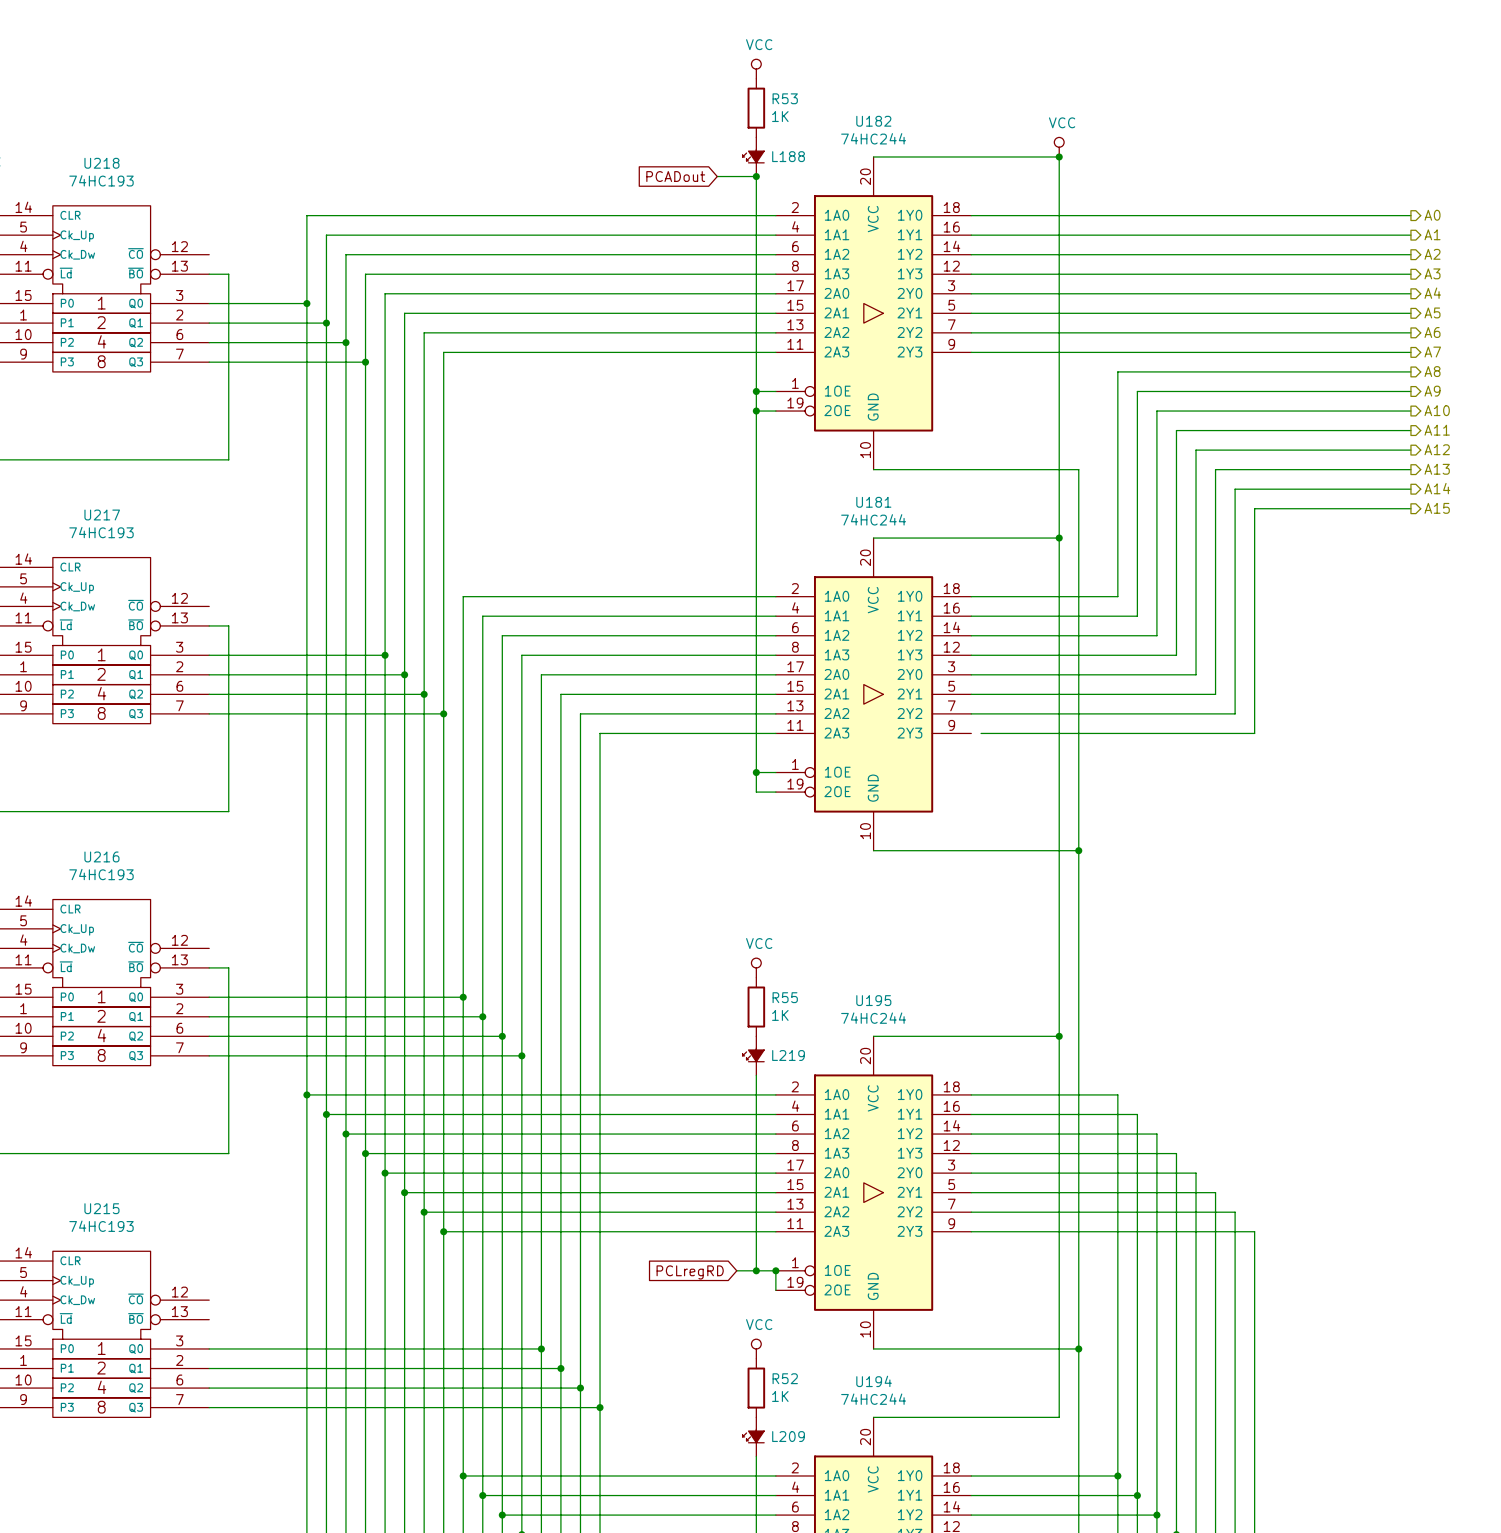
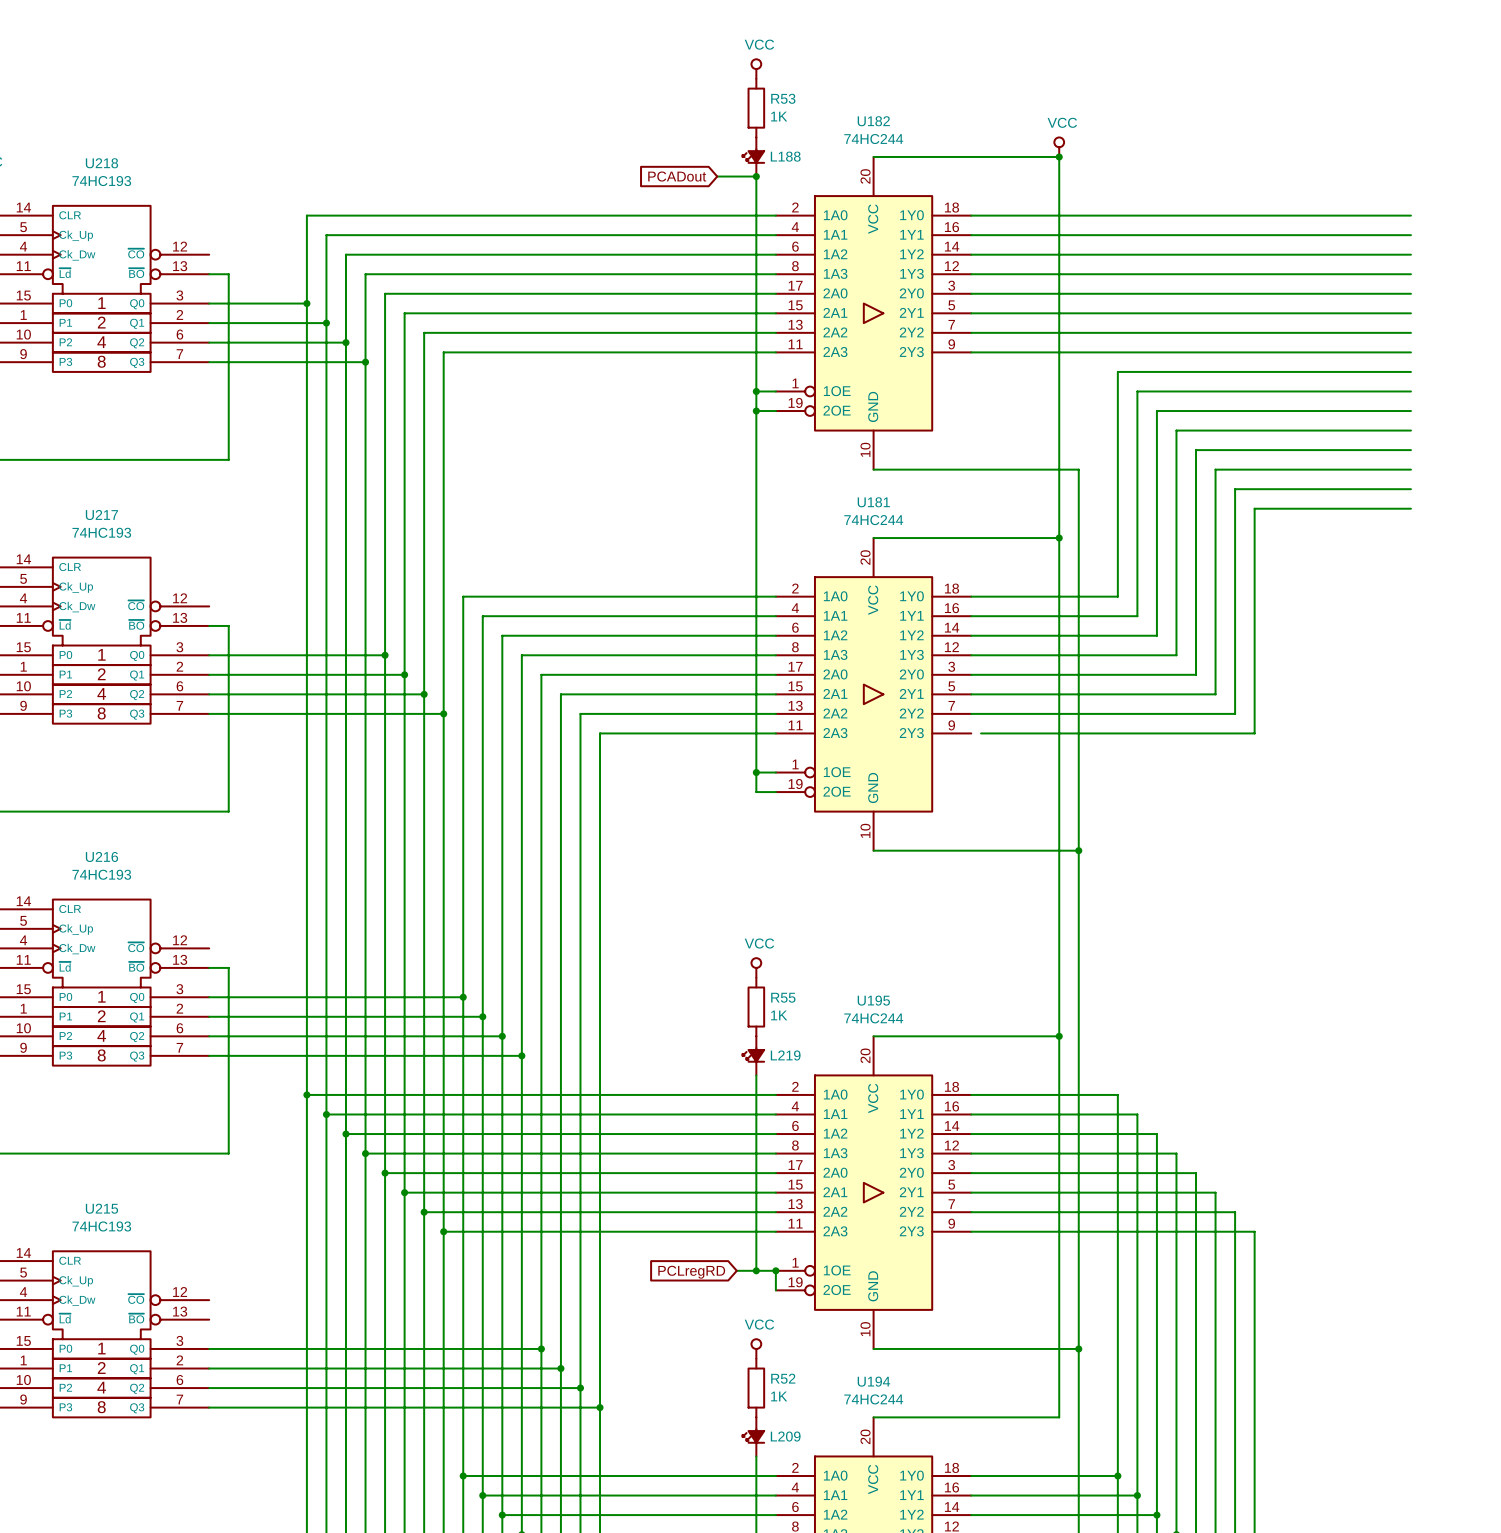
hierarchical label: A0 (1432, 215) -> none
hierarchical label: A1 (1432, 234) -> none
hierarchical label: A2 (1432, 254) -> none
hierarchical label: A3 (1432, 273) -> none
hierarchical label: A4 (1432, 293) -> none
hierarchical label: A5 (1432, 312) -> none
hierarchical label: A6 (1432, 332) -> none
hierarchical label: A7 (1432, 352) -> none
hierarchical label: A8 (1432, 371) -> none
hierarchical label: A9 (1432, 391) -> none
hierarchical label: A10 (1437, 410) -> none
hierarchical label: A11 (1437, 430) -> none
hierarchical label: A12 (1437, 449) -> none
hierarchical label: A13 (1437, 469) -> none
hierarchical label: A14 (1437, 488) -> none
hierarchical label: A15 (1437, 508) -> none

